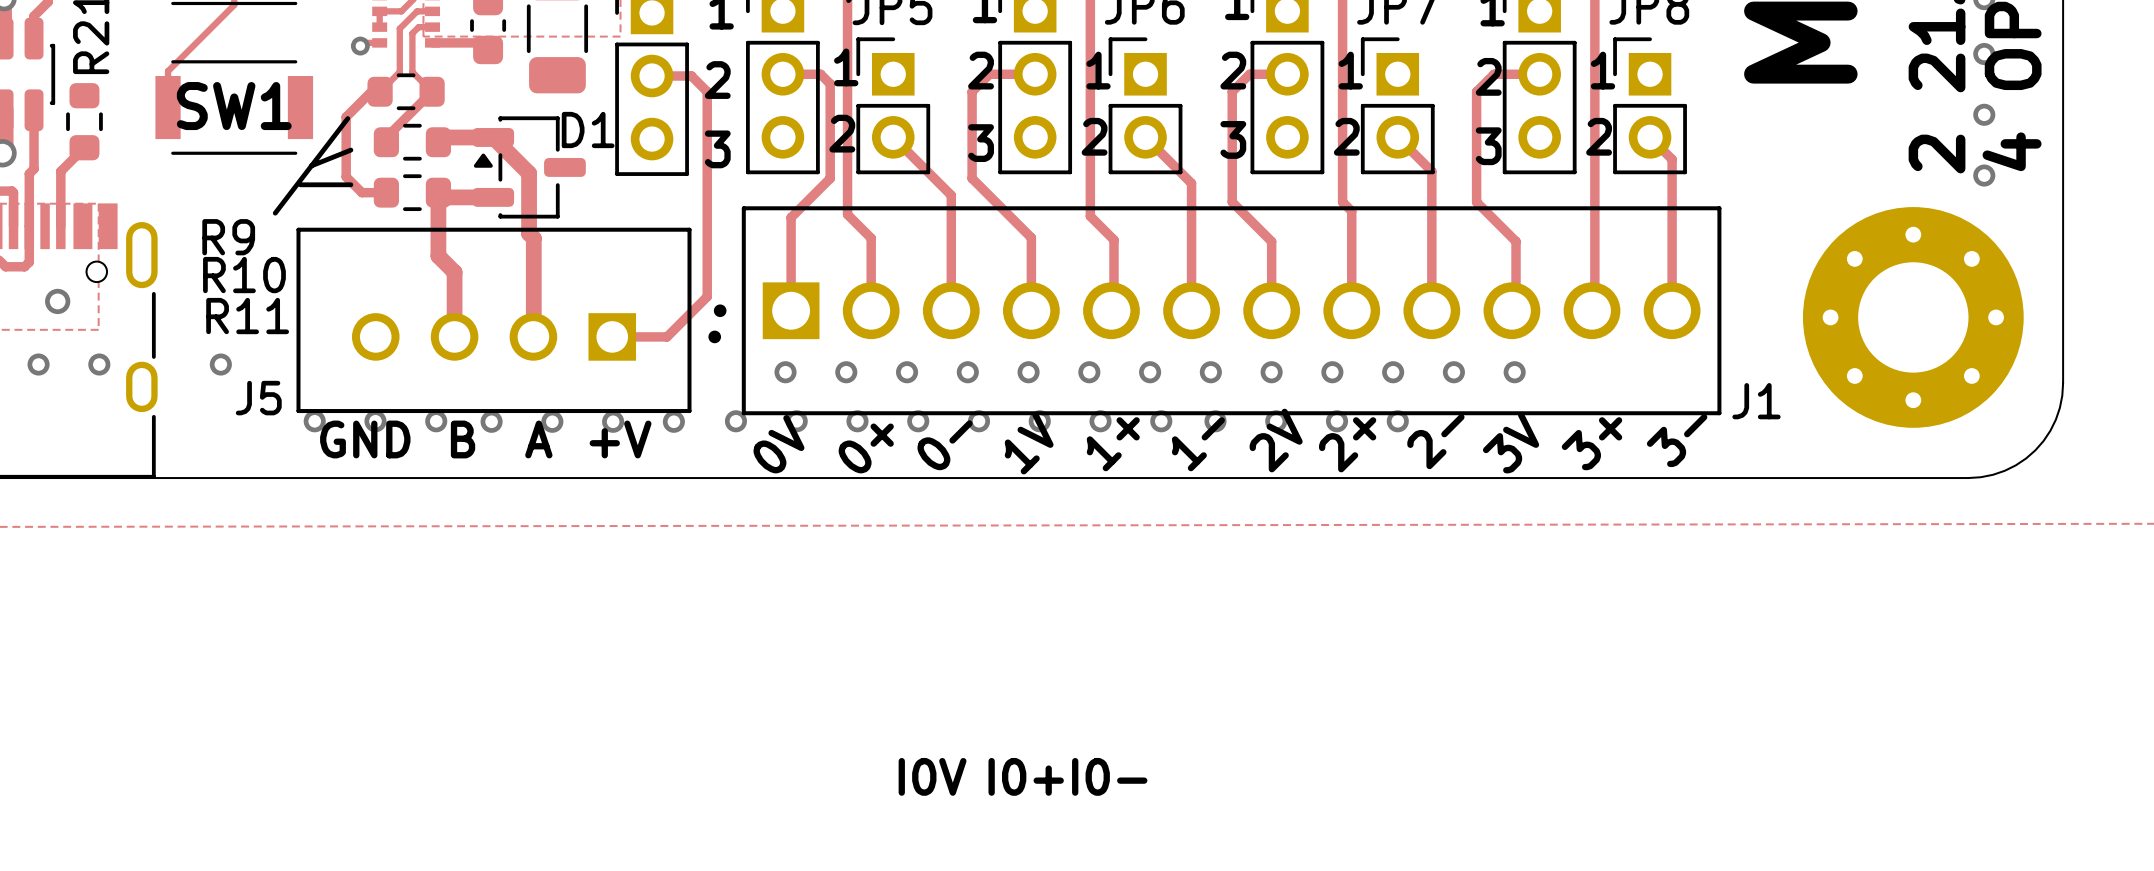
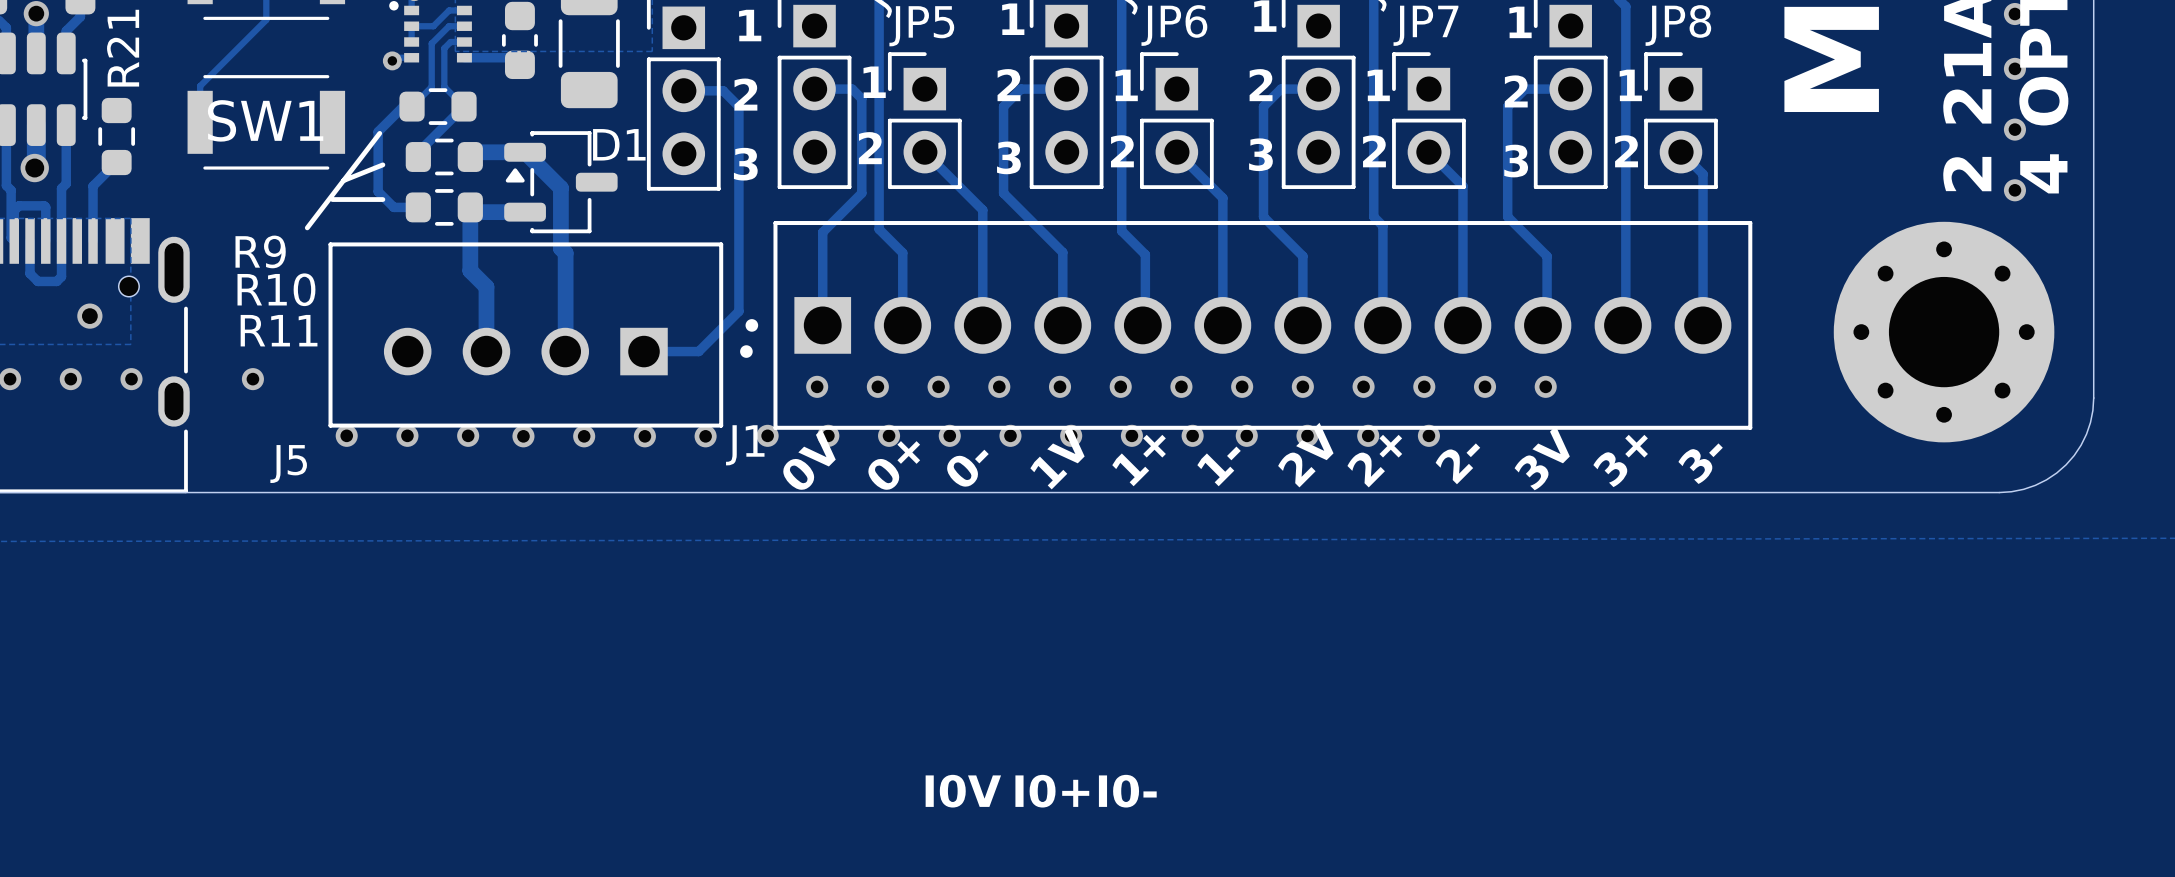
J5 name position: J5 (258, 398) -> J5 (288, 464)
J1 name position: J1 (1756, 401) -> J1 (745, 445)
text: GND (365, 439) -> none
text: B (463, 439) -> none
text: A (538, 439) -> none
text: +V (620, 439) -> none

